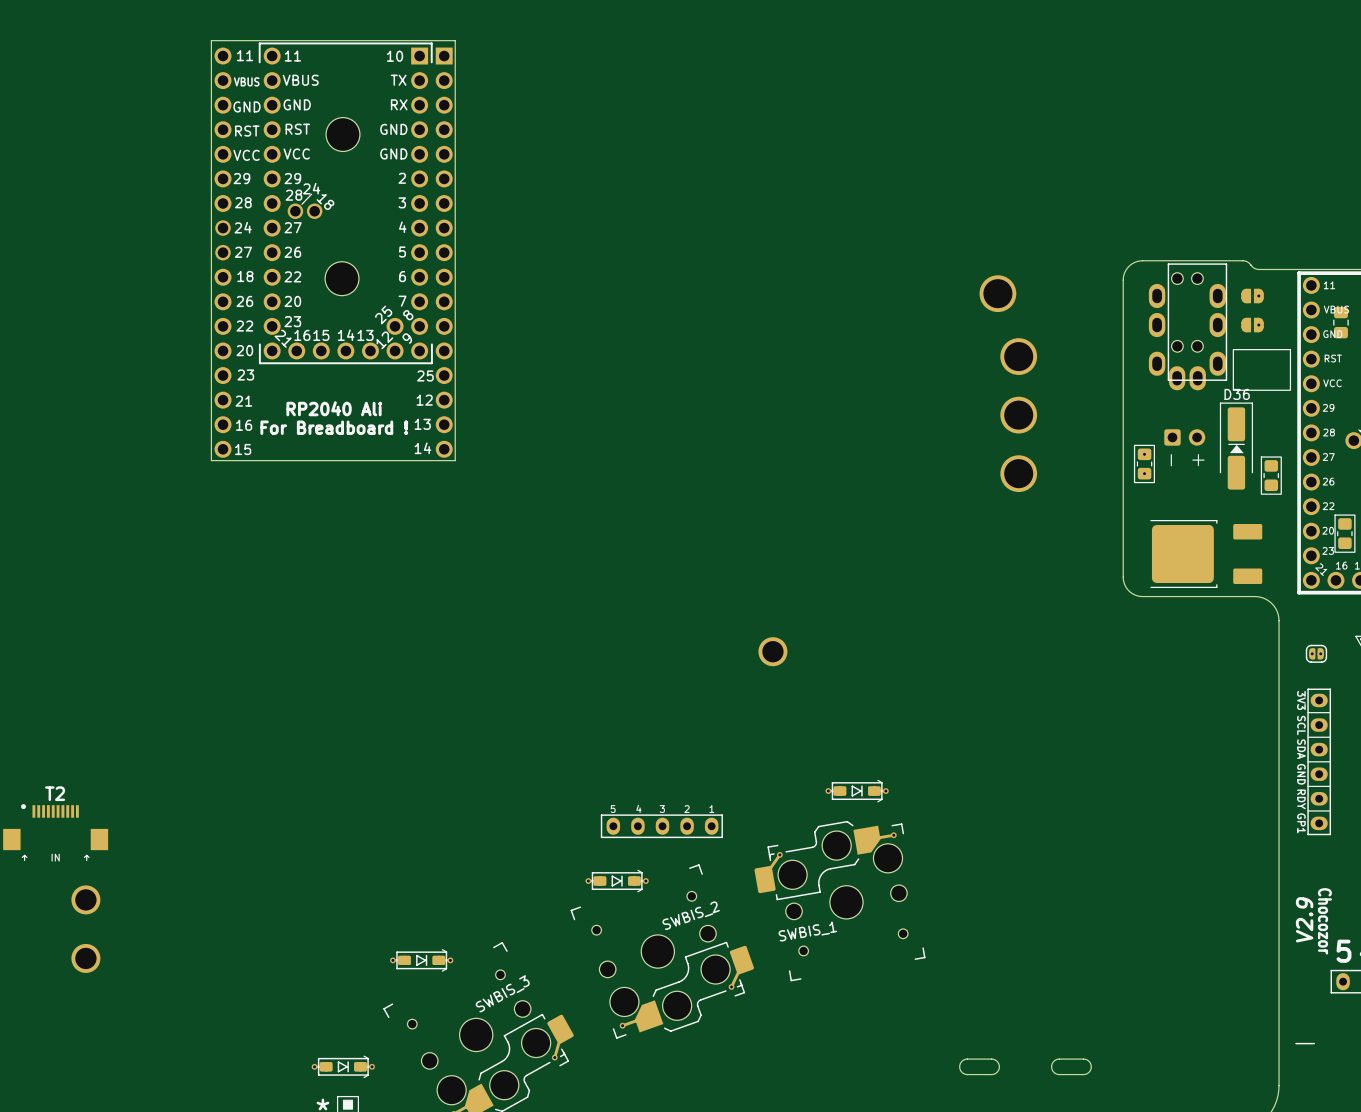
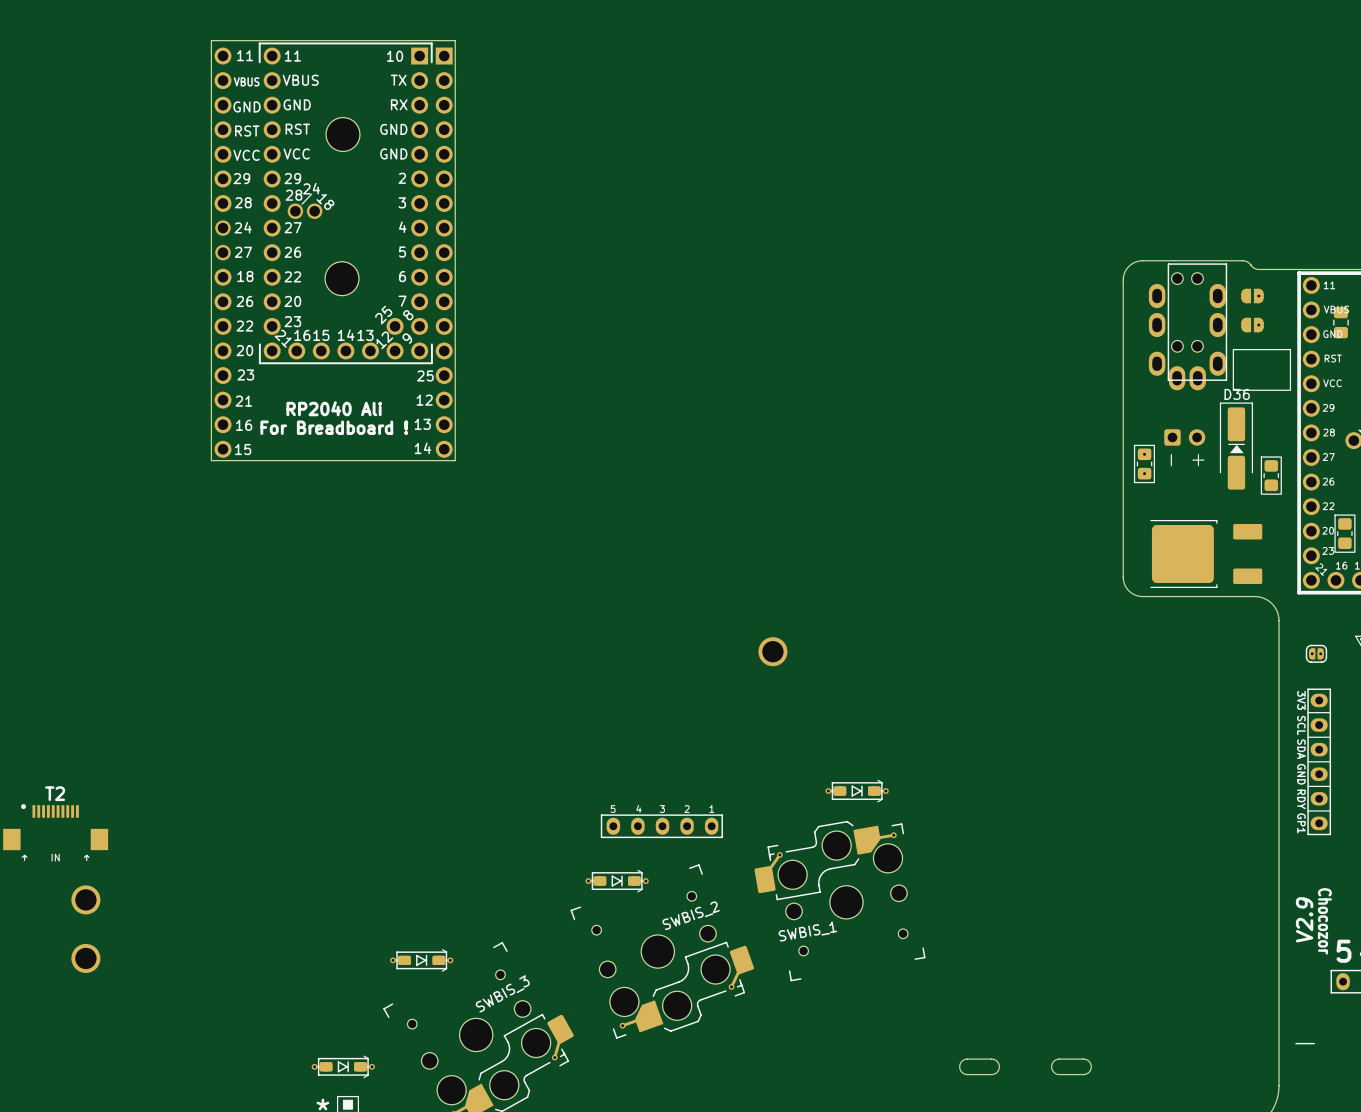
part: (997, 293) -> none
part: (1018, 356) -> none
part: (1018, 415) -> none
part: (1018, 473) -> none

